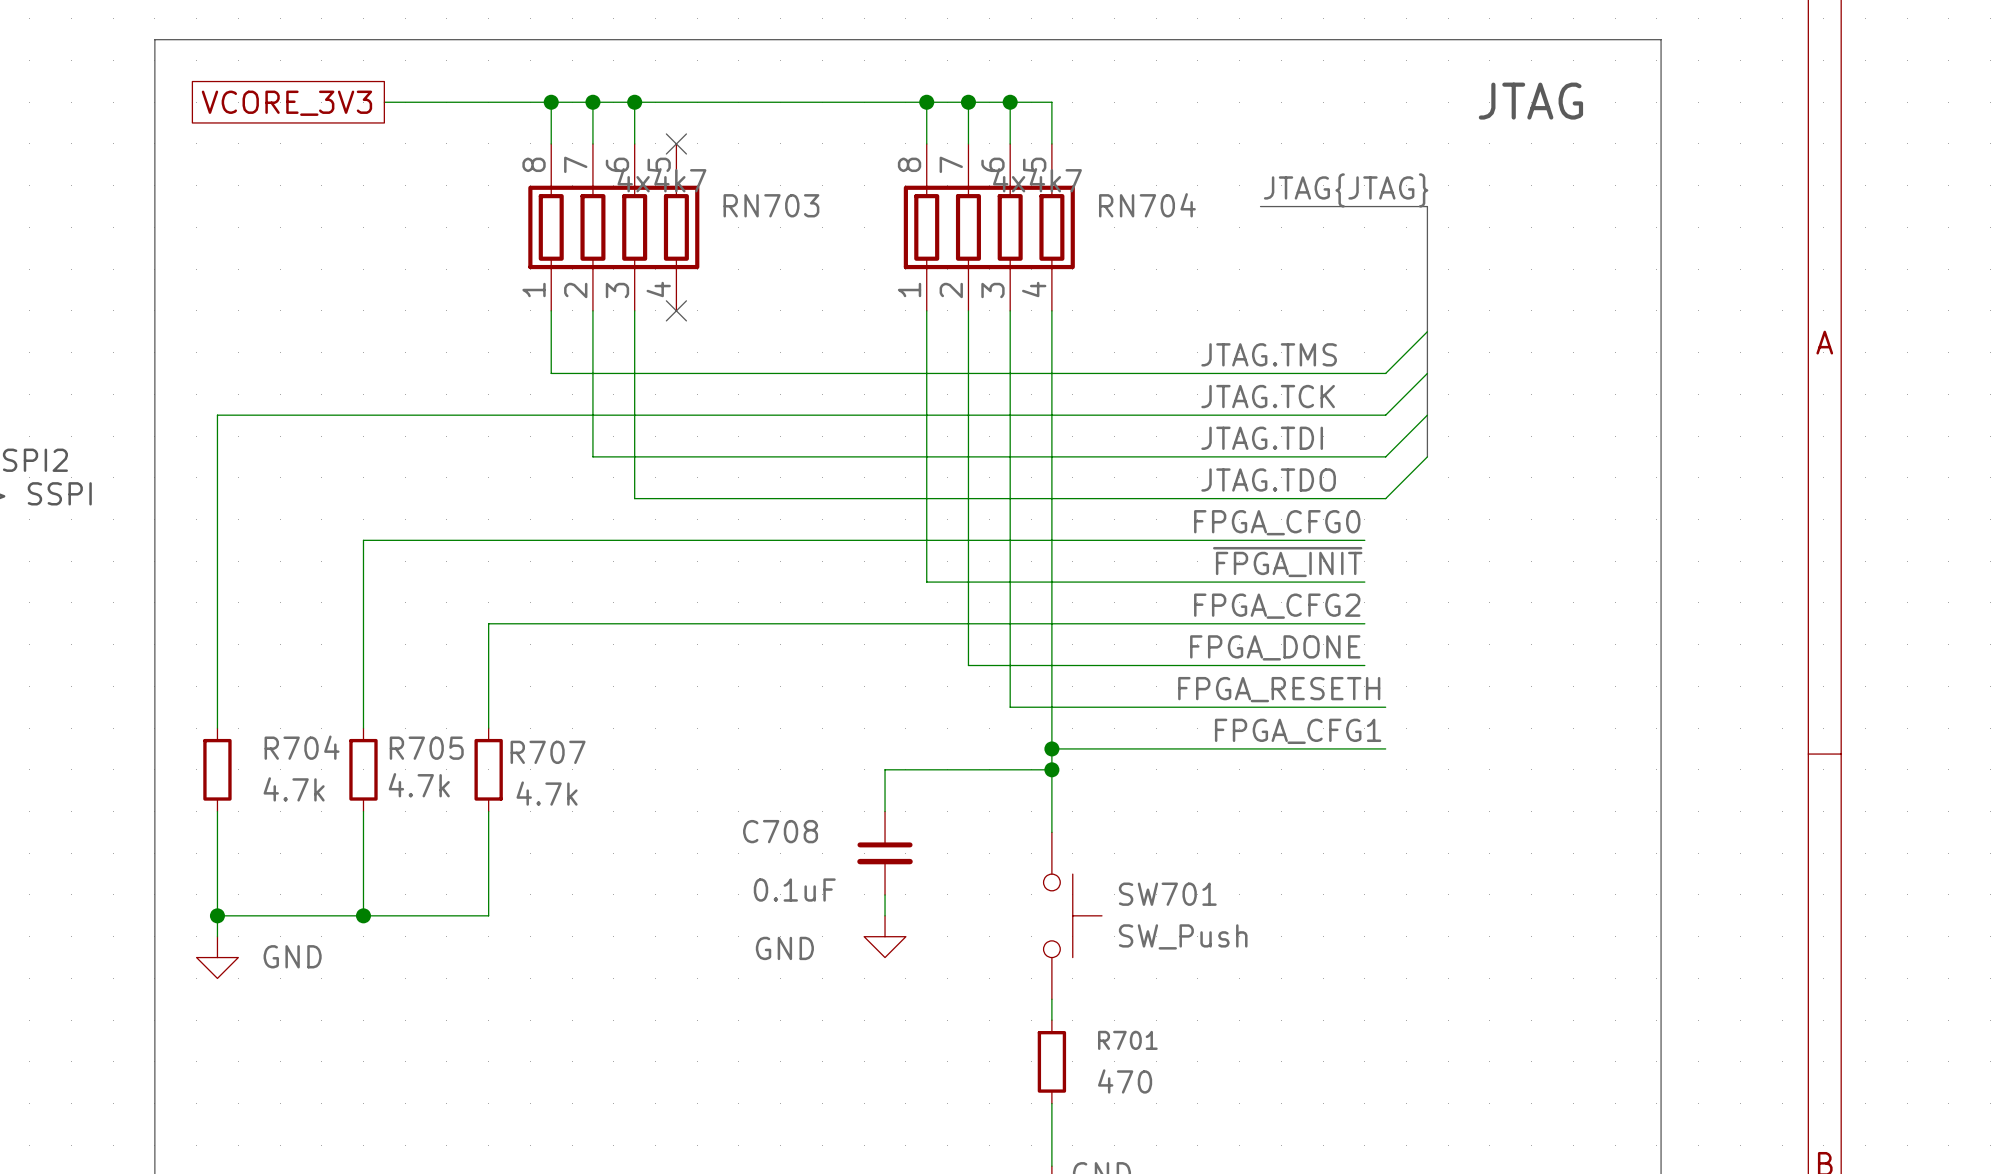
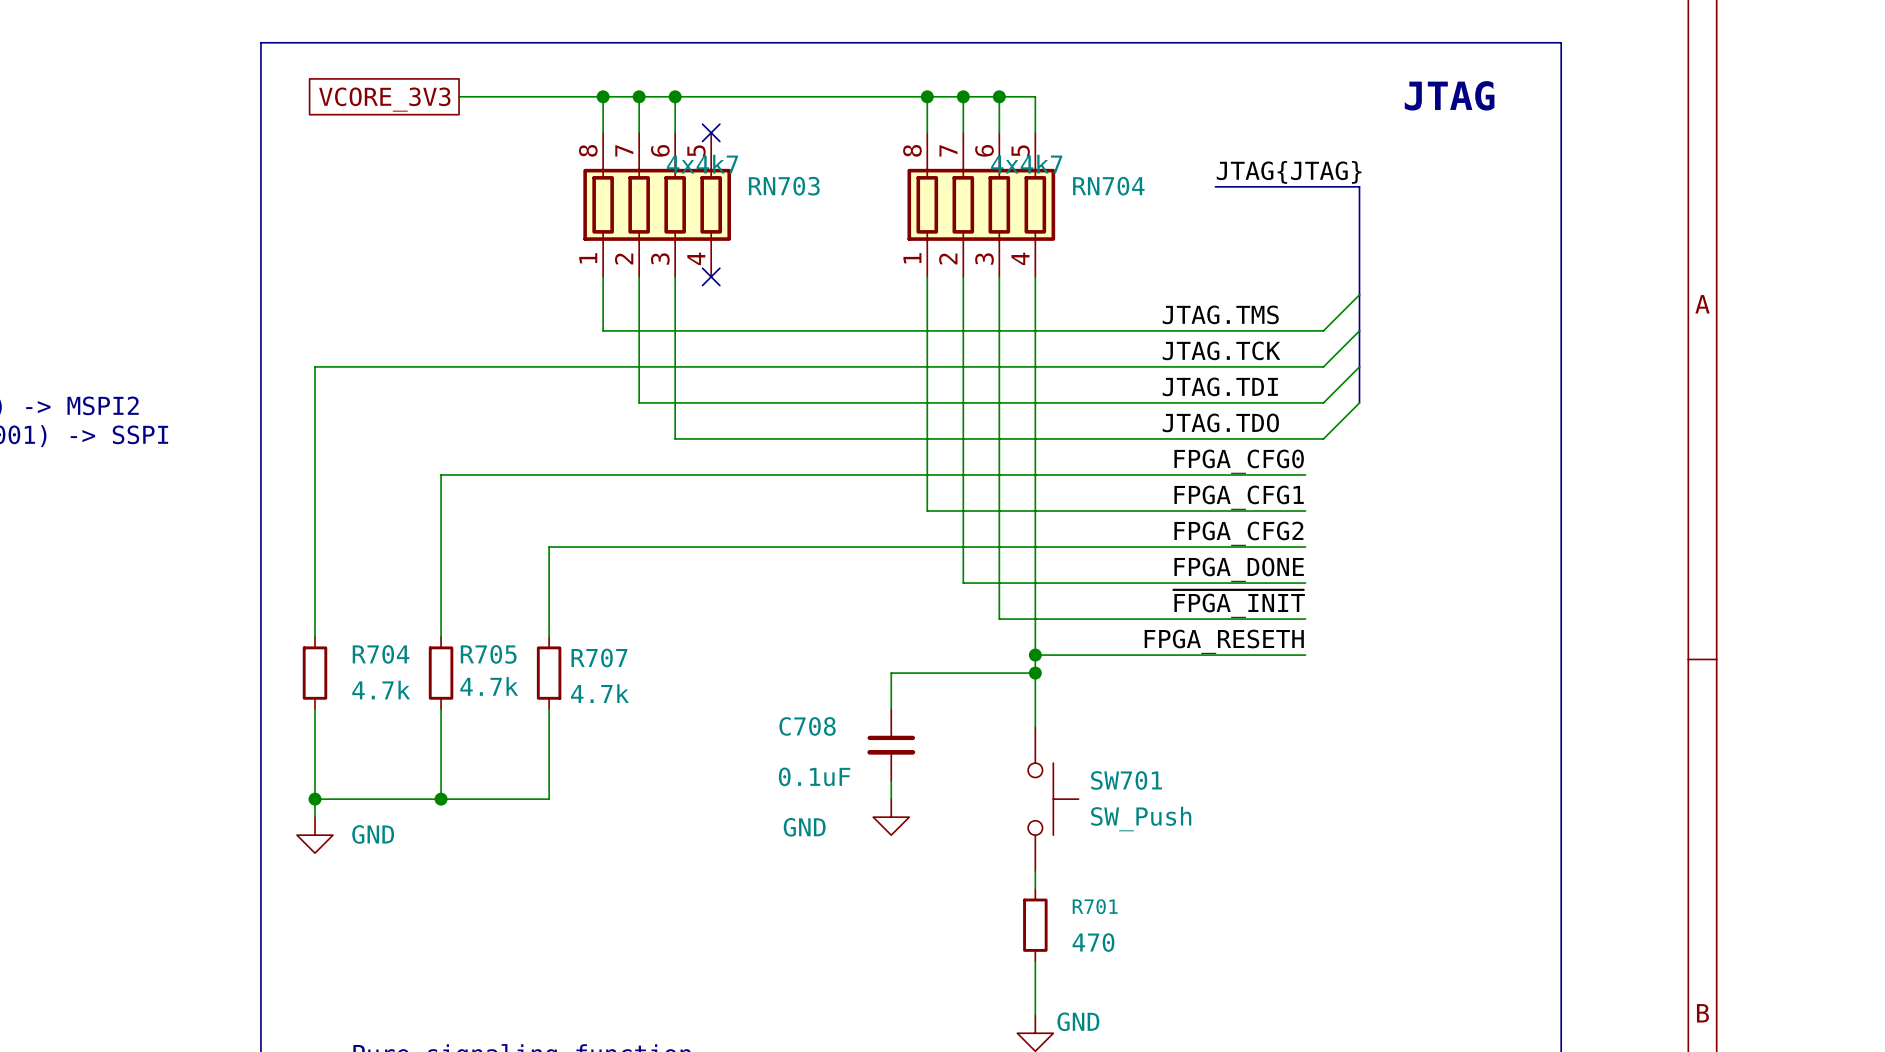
label: ~{FPGA_INIT} (1287, 562) -> FPGA_CFG1 (1239, 497)
label: none -> ~{FPGA_INIT} (1239, 603)
label position: FPGA_RESETH (1279, 689) -> FPGA_RESETH (1224, 641)
wire: (1364, 707) (1385, 707) -> none
label: FPGA_CFG1 (1298, 731) -> none
wire: (1364, 748) (1385, 748) -> none

